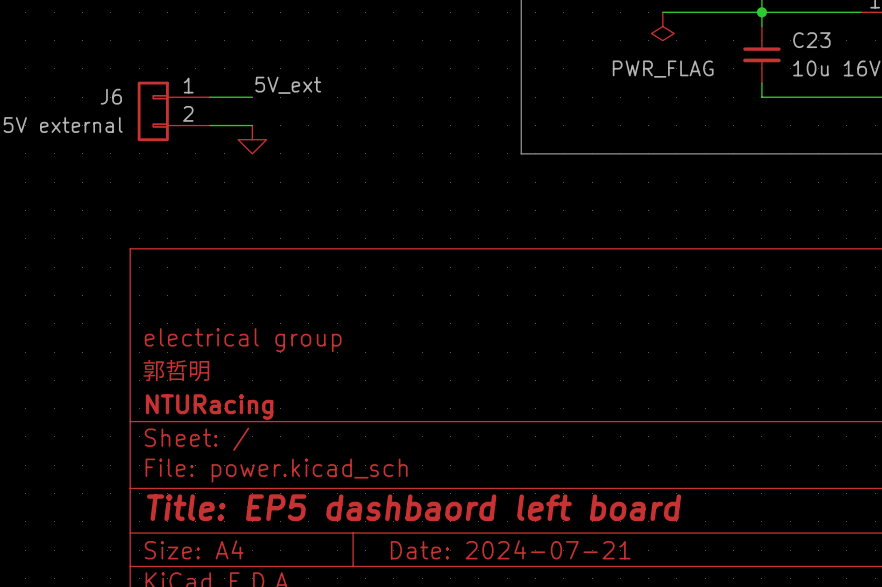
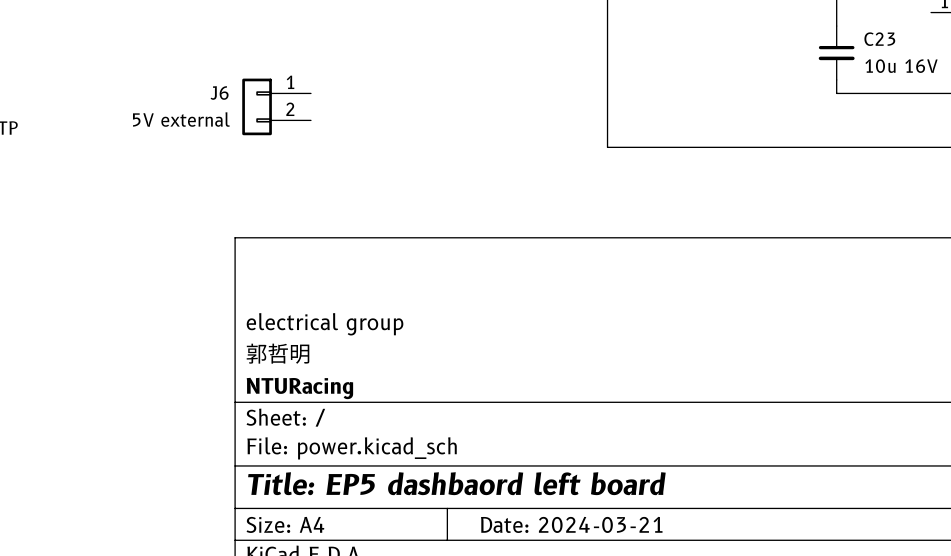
wire: (662, 12) (861, 12) -> none
junction: (761, 12) -> none
power symbol: PWR_FLAG (662, 26) -> none
label: 5V_ext (288, 85) -> none
wire: (209, 97) (252, 97) -> none
wire: (209, 125) (252, 125) -> none
power symbol: (252, 139) -> none
title block: Date: 2024-07-21 (510, 549) -> Date: 2024-03-21 (571, 524)

